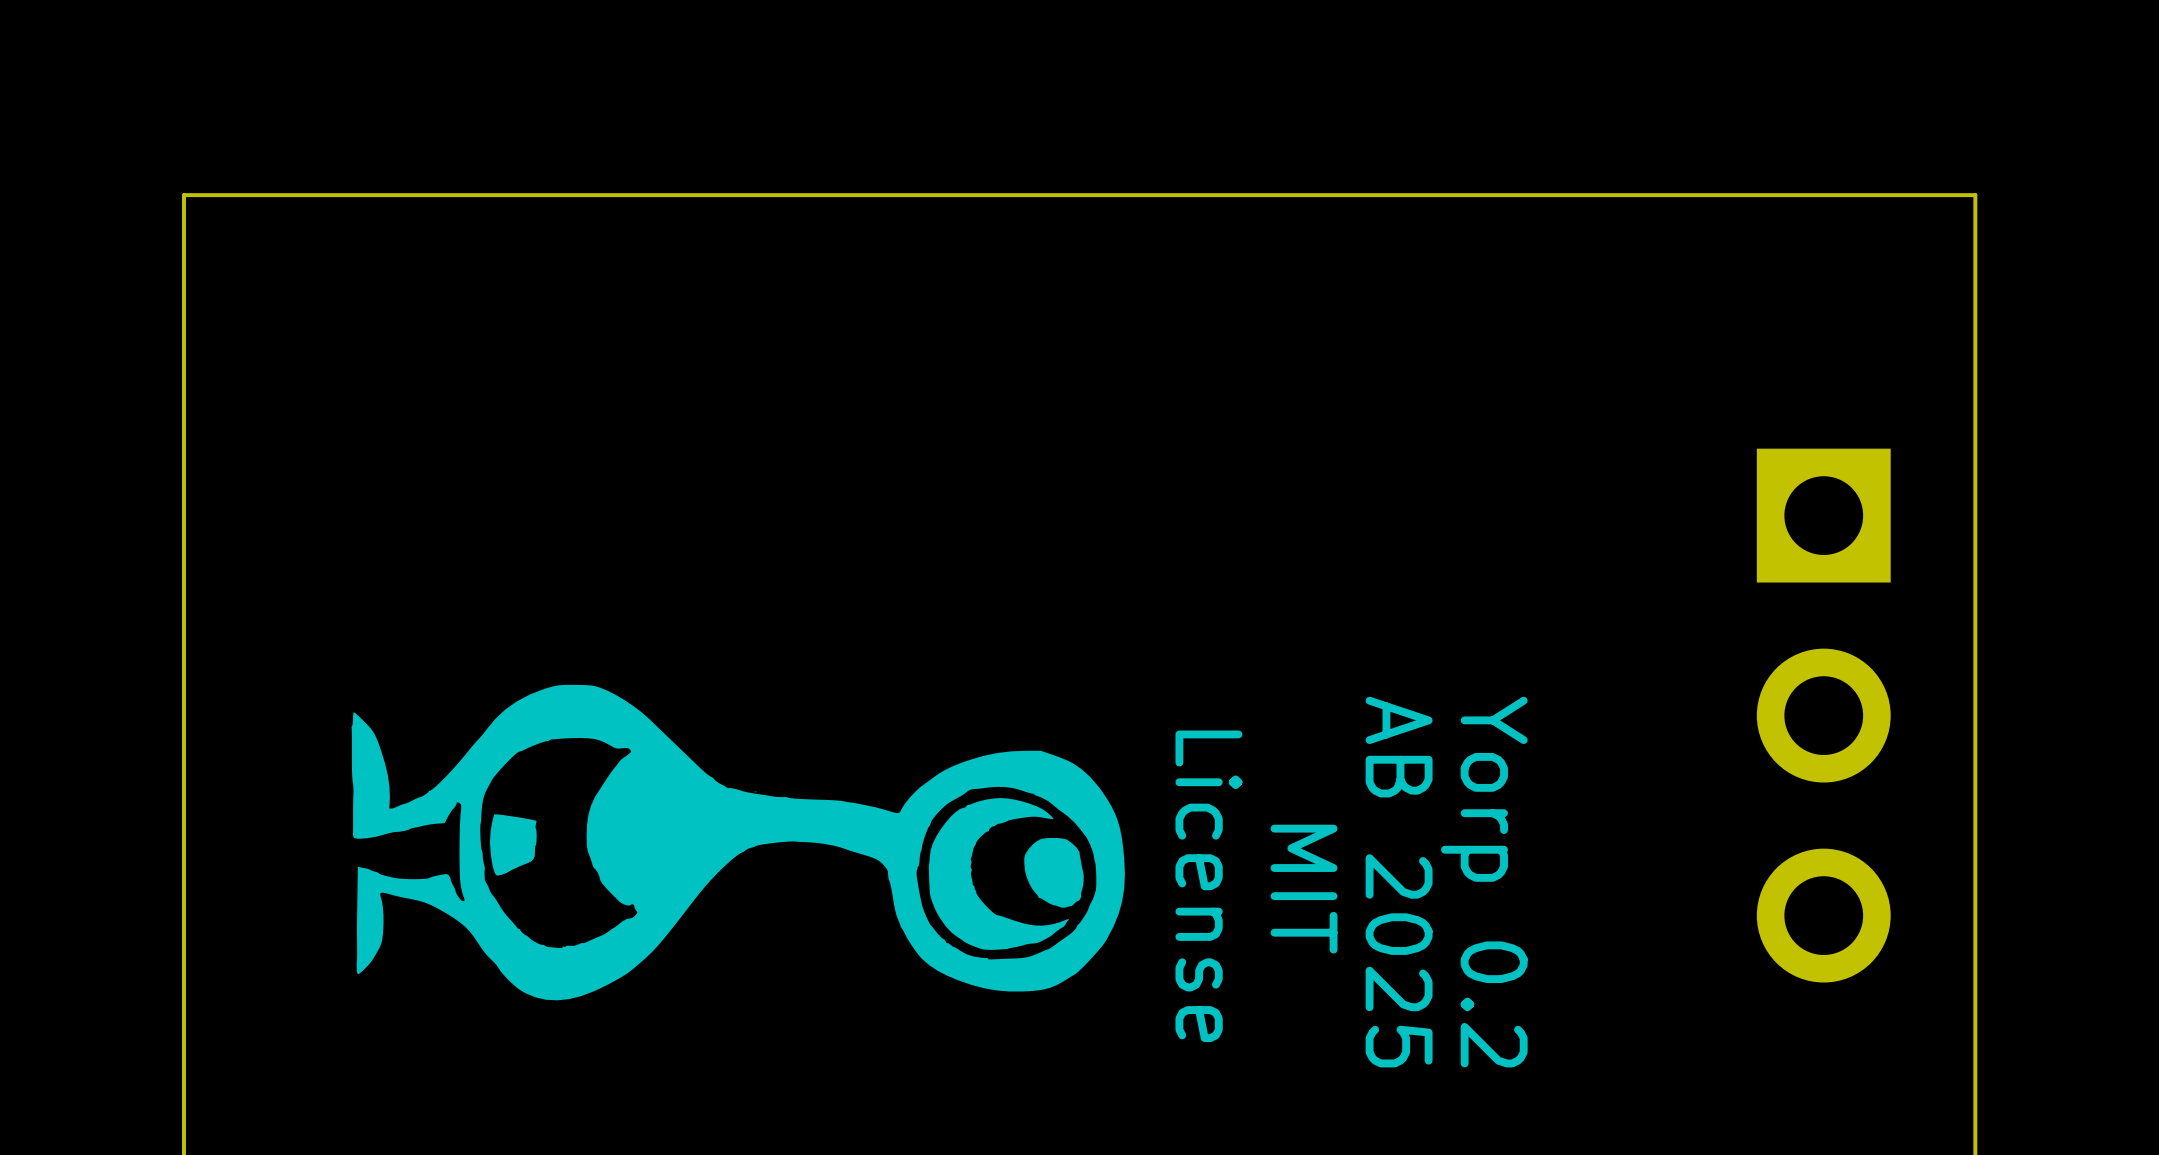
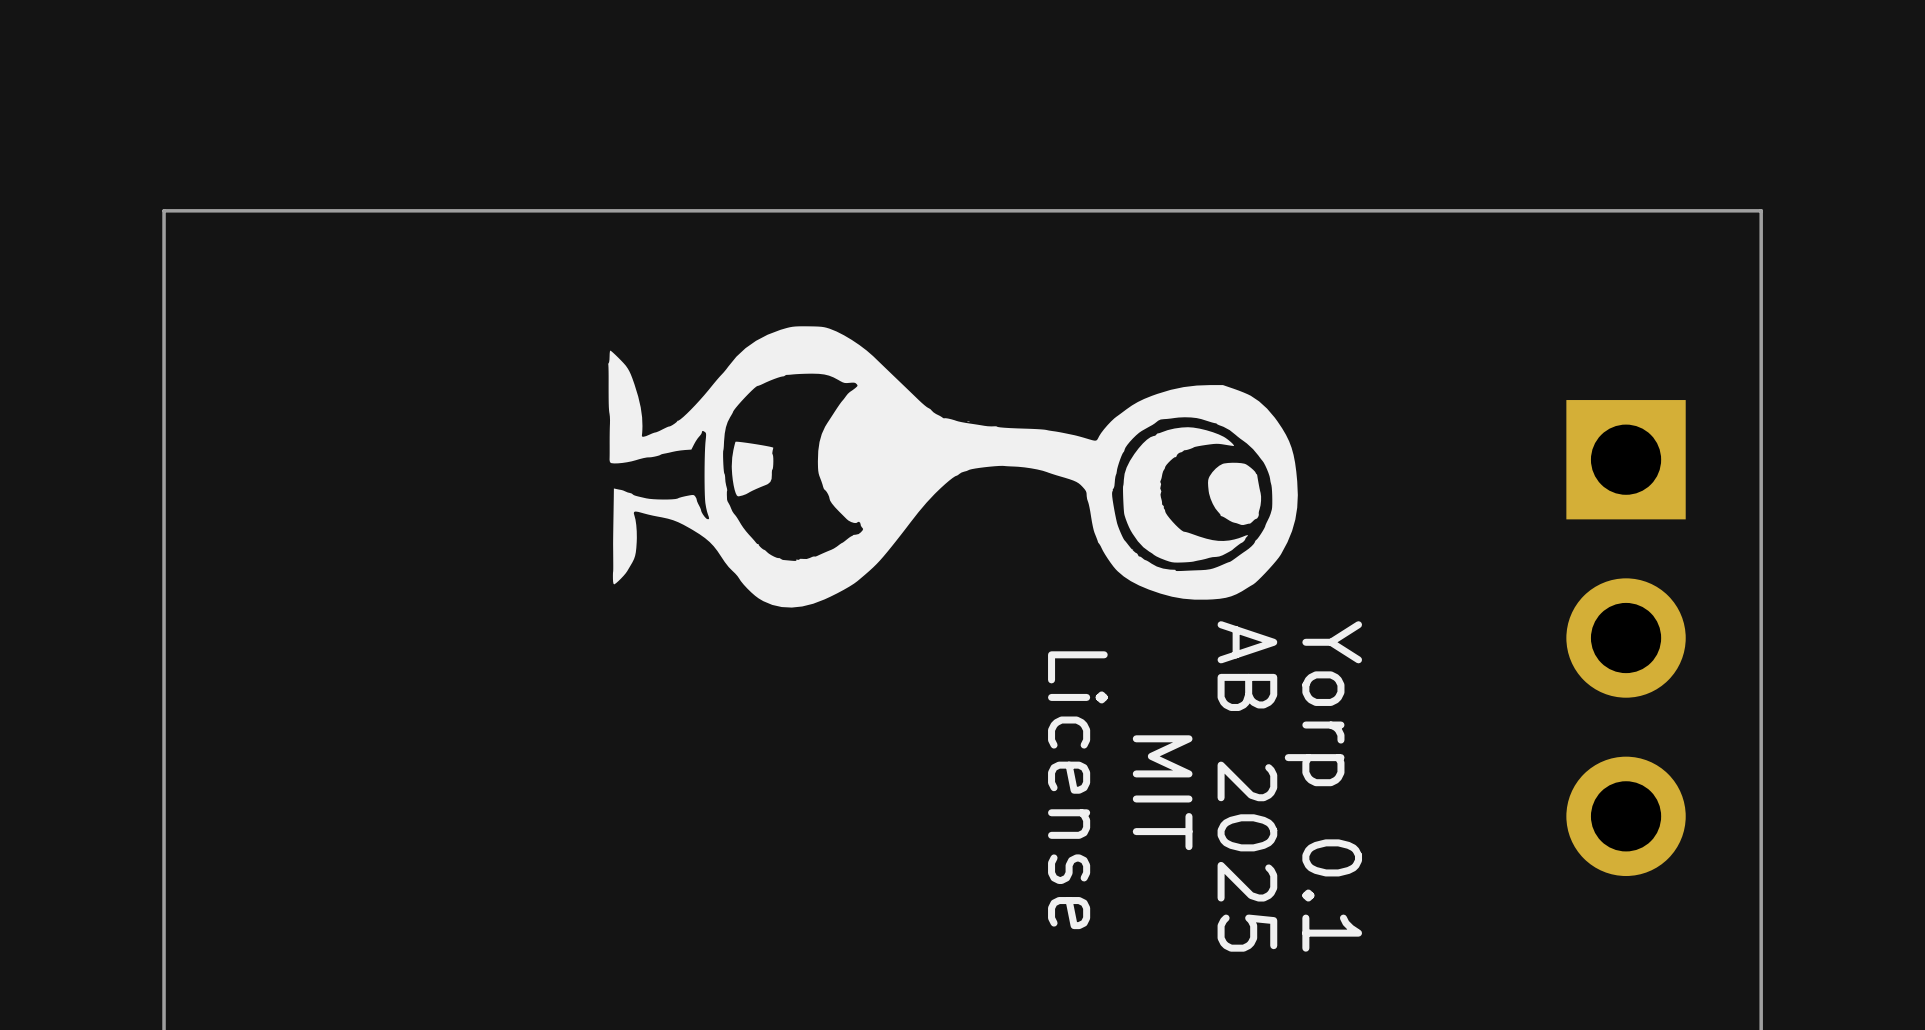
board edge: (1975, 236) (1975, 195) (183, 195) (183, 236) -> (1761, 210) (164, 210)
drawing position: (738, 842) -> (953, 466)
text: Yorp 0.2 (1484, 882) -> Yorp 0.1 (1323, 786)

